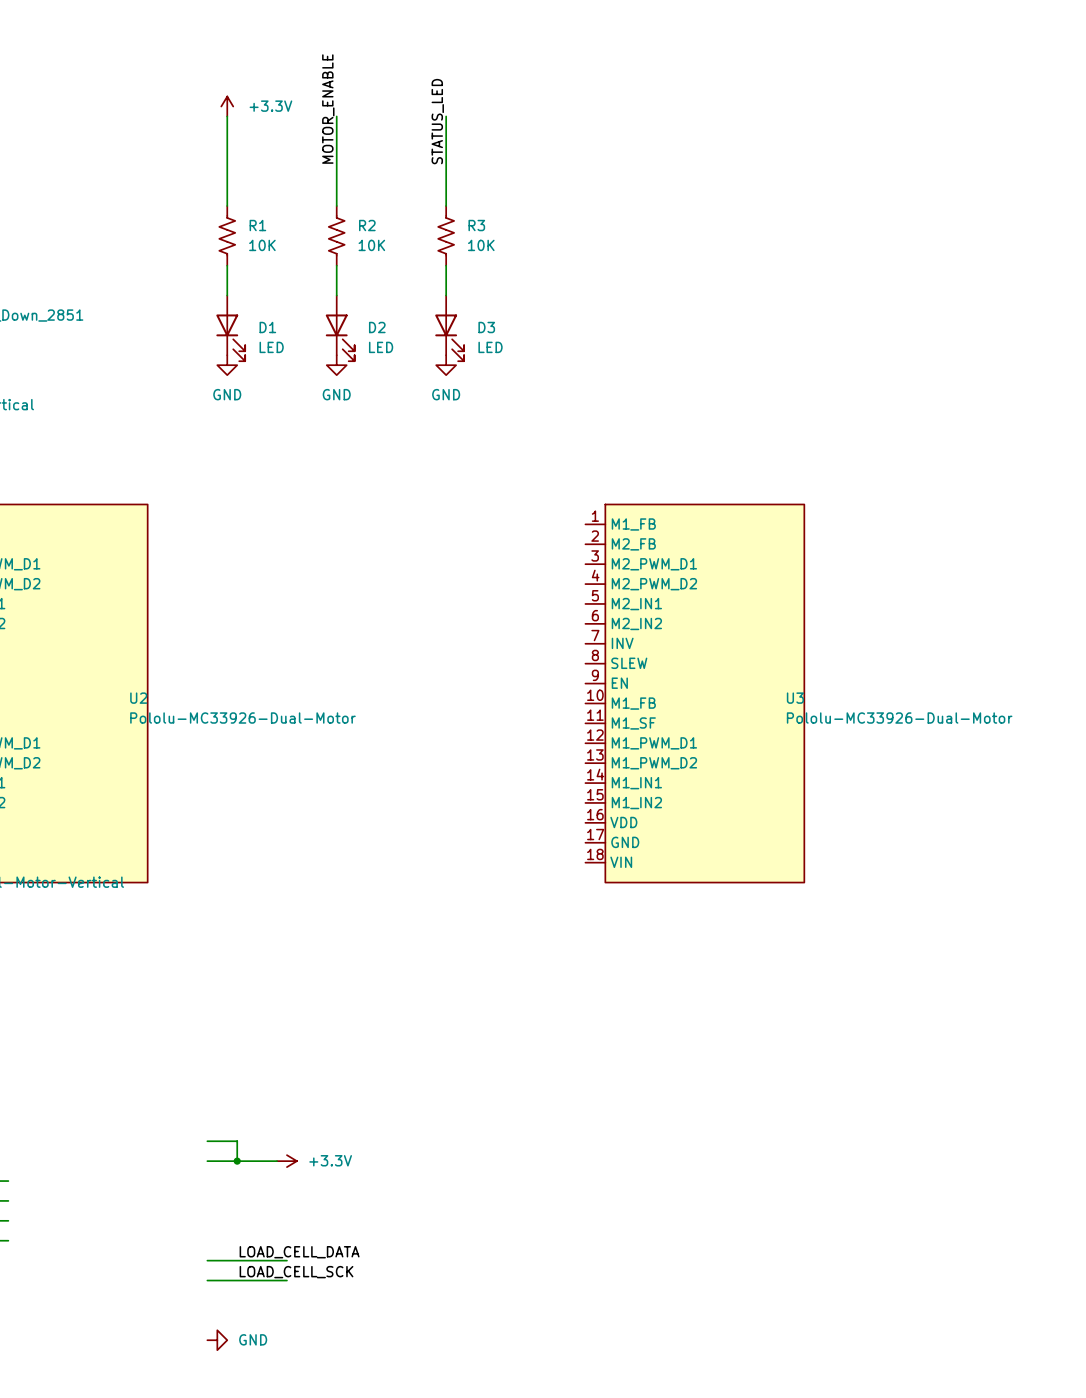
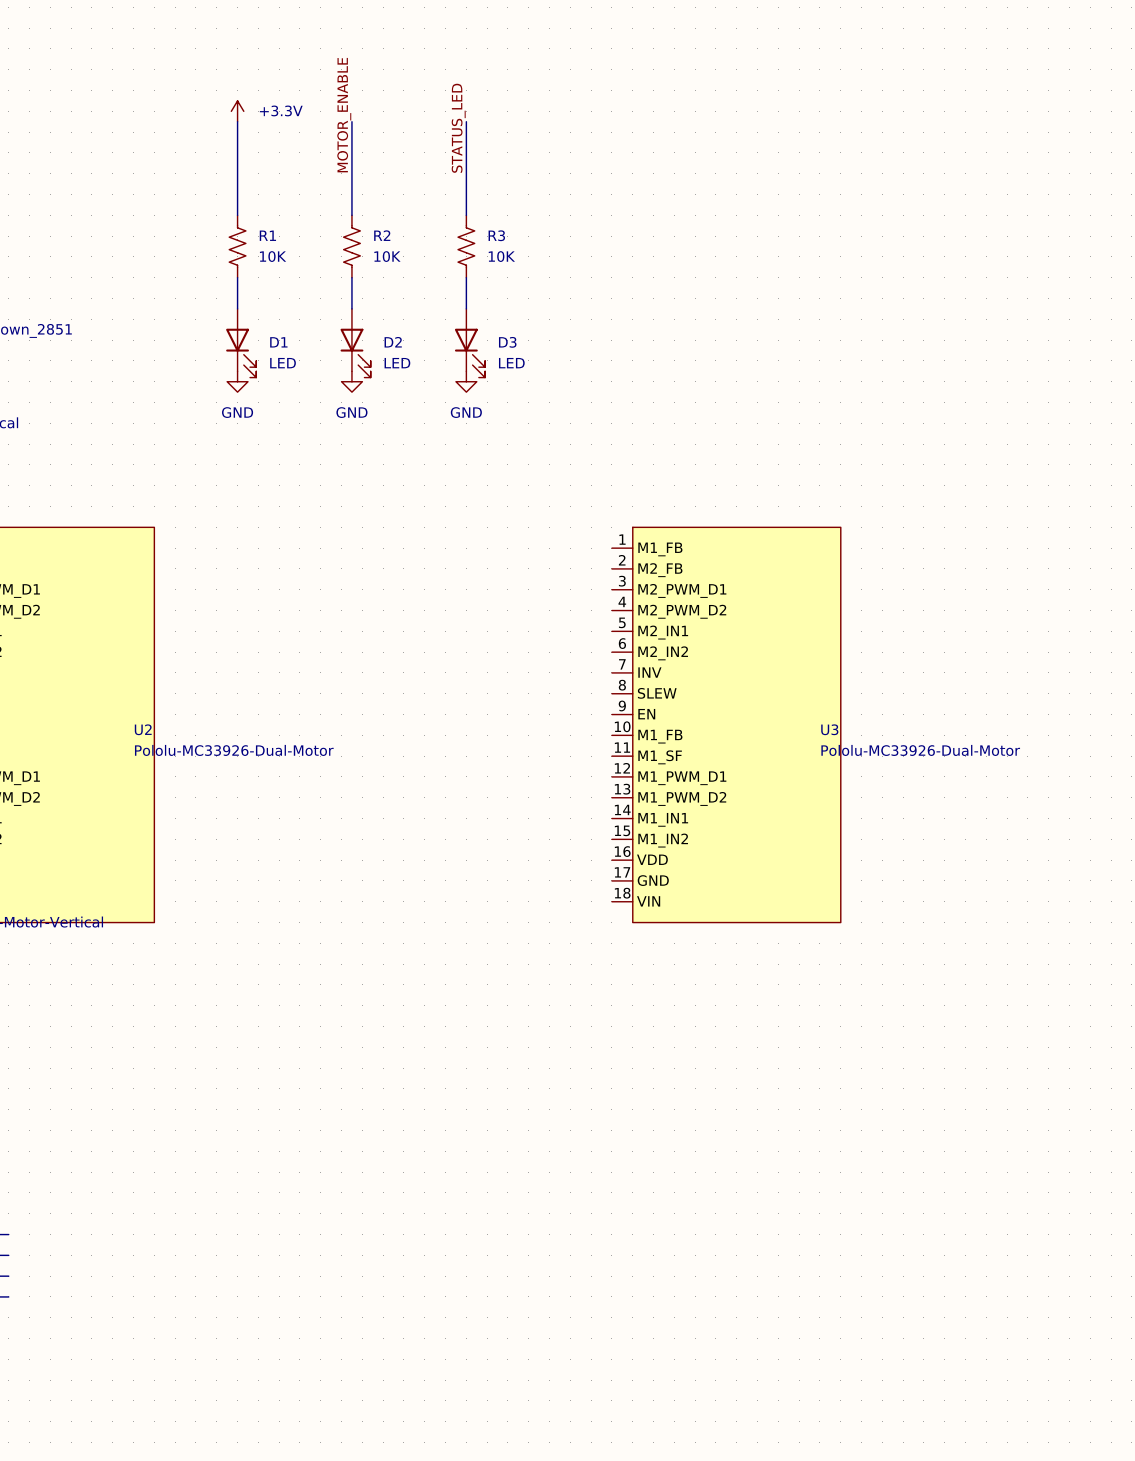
wire: (207, 1141) (237, 1141) (237, 1161) -> none
wire: (207, 1161) (277, 1161) -> none
junction: (237, 1161) -> none
power symbol: +3.3V (286, 1161) -> none
label: LOAD_CELL_DATA (299, 1252) -> none
wire: (207, 1260) (286, 1260) -> none
label: LOAD_CELL_SCK (296, 1272) -> none
wire: (207, 1280) (286, 1280) -> none
power symbol: GND (217, 1340) -> none

